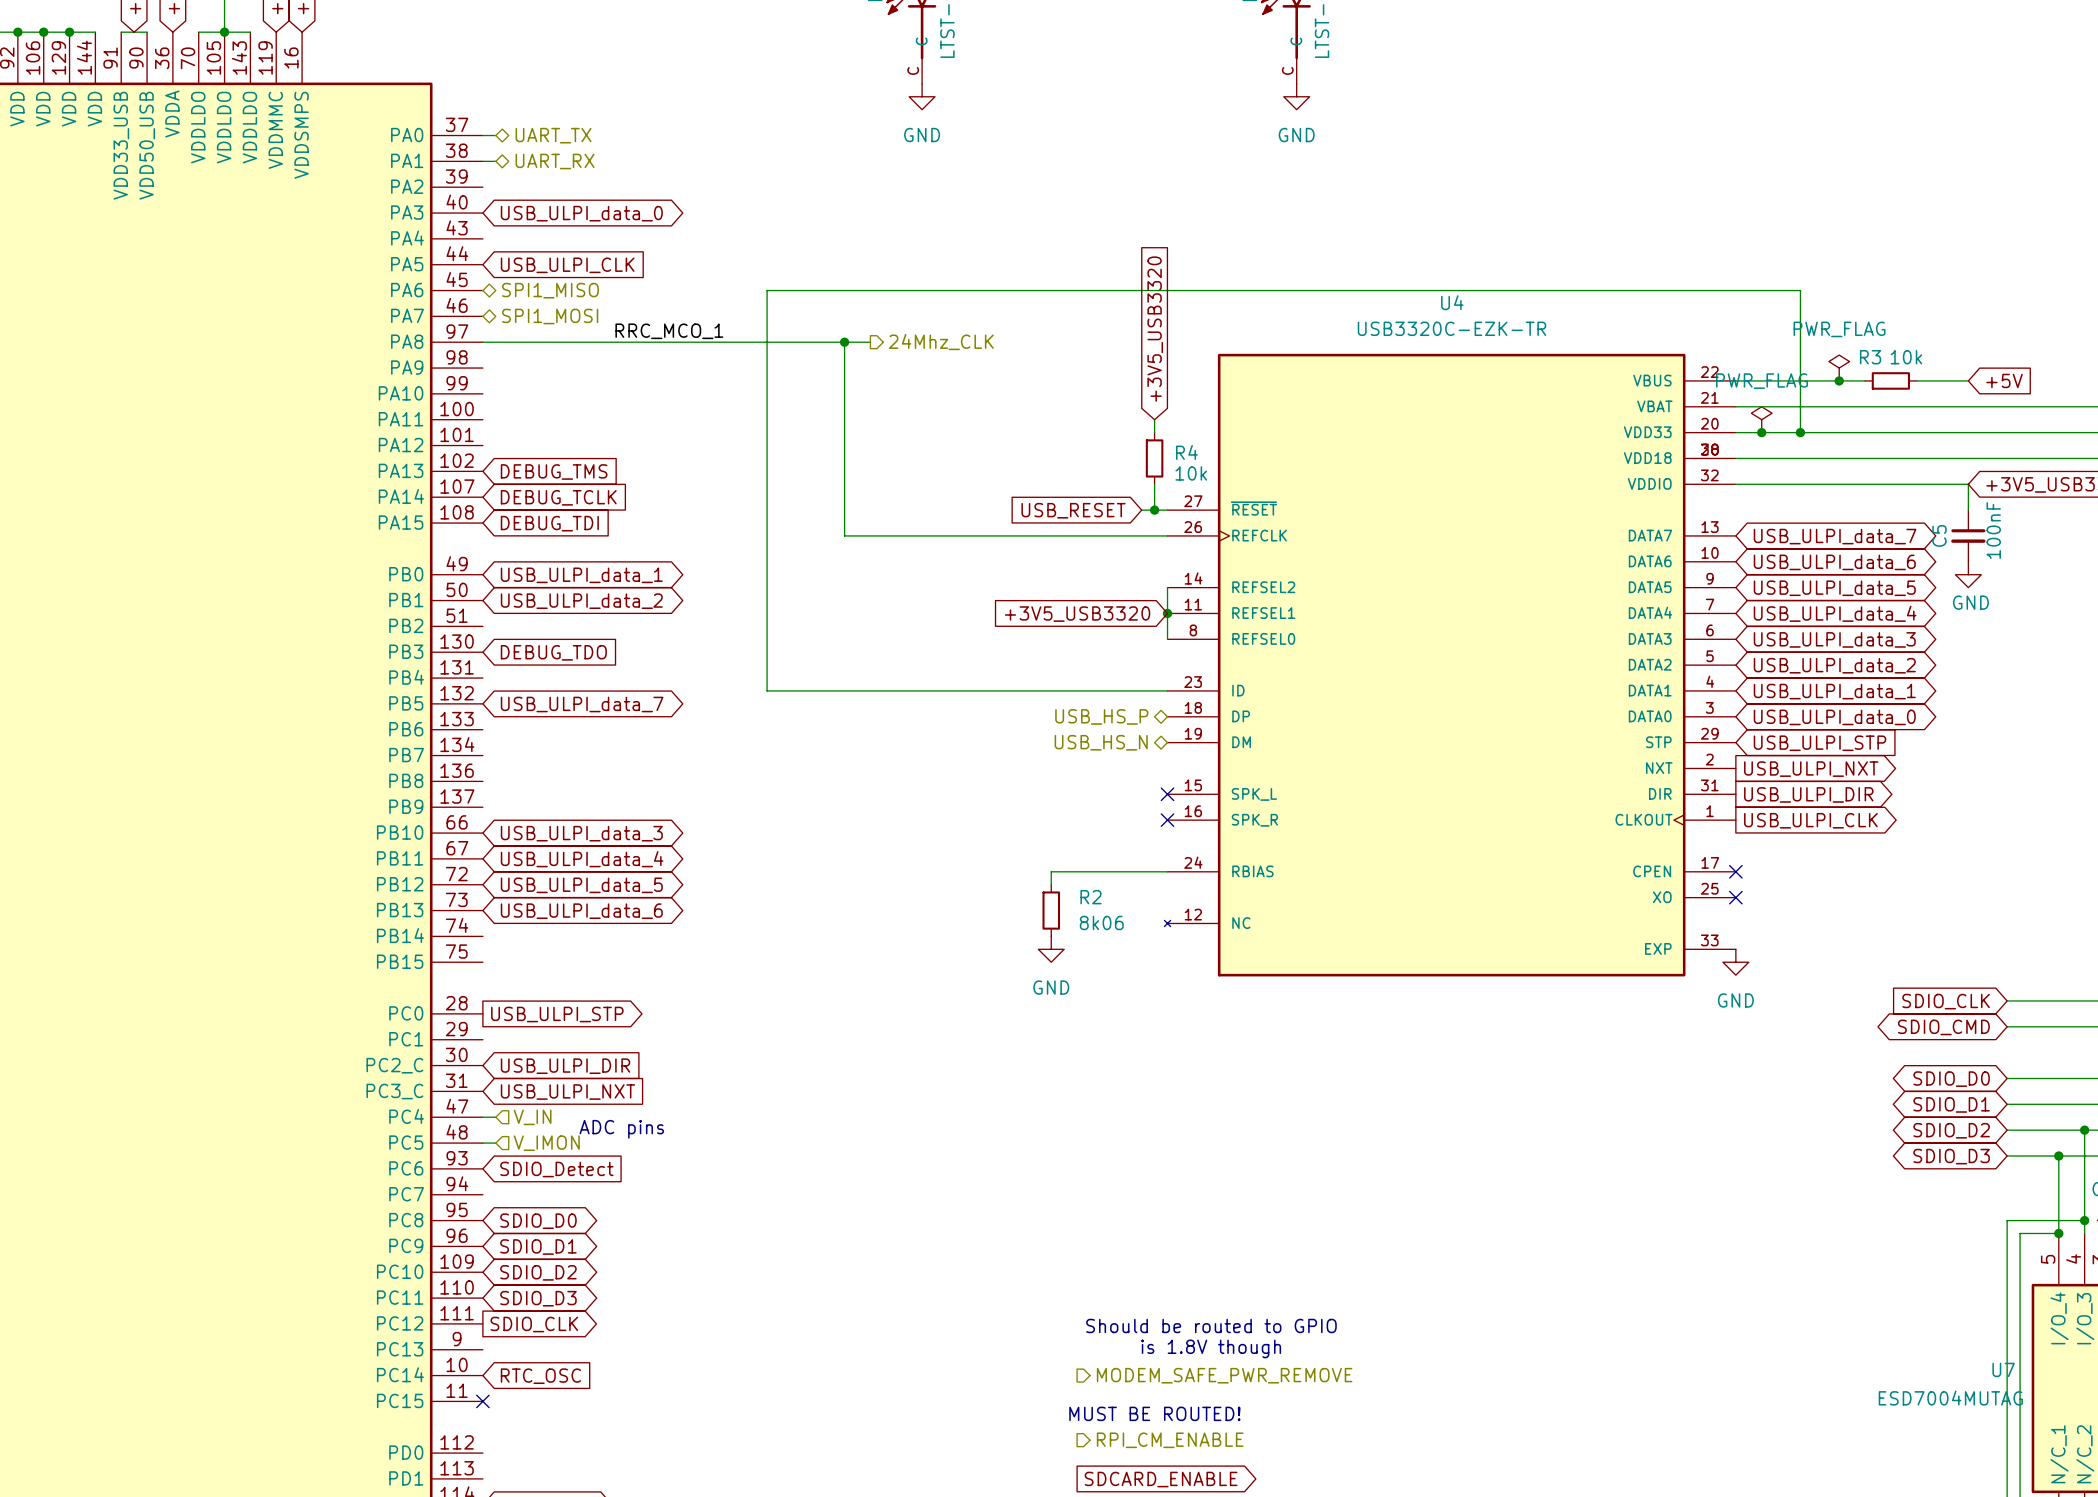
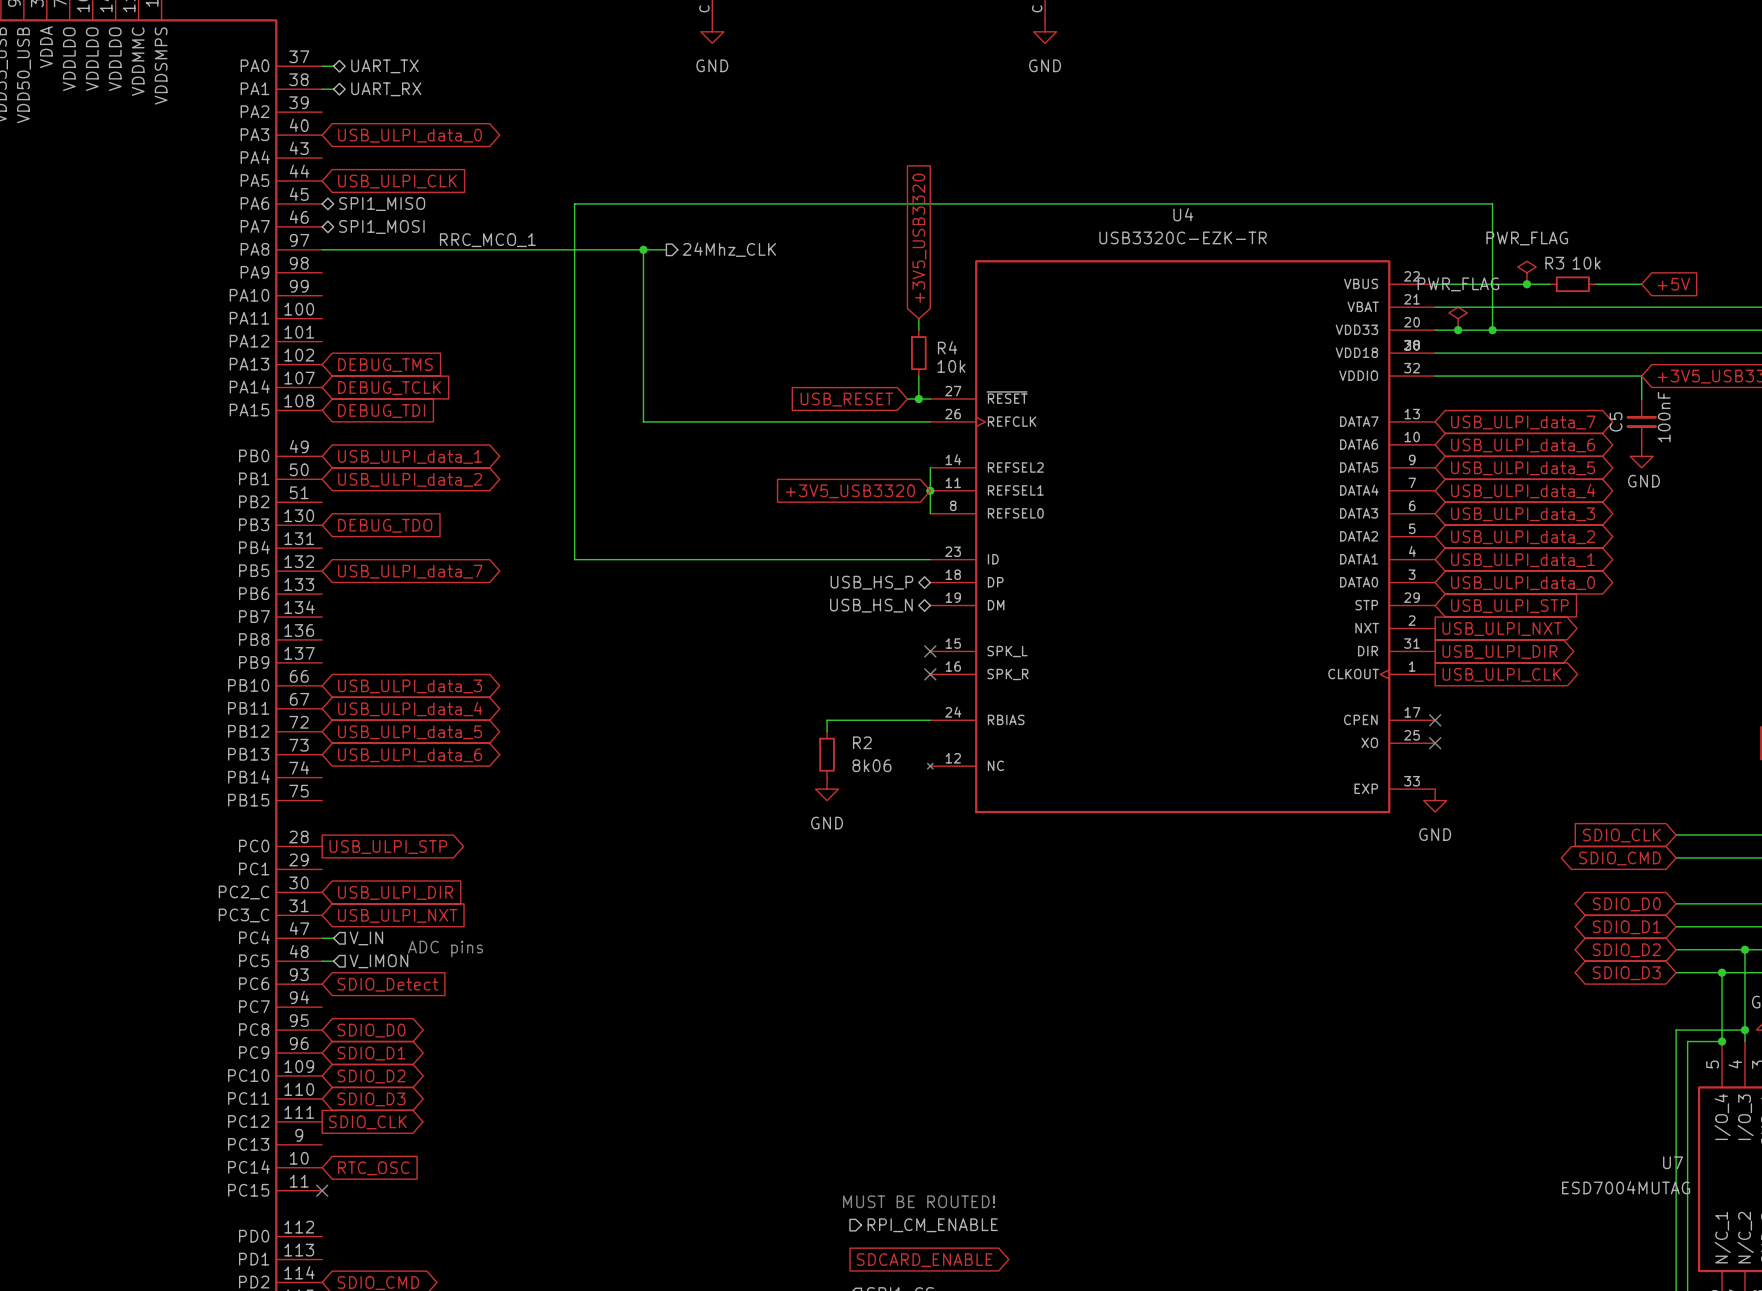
text: Should be routed to GPIO (1211, 1325) -> none
text: is 1.8V though (1211, 1348) -> none
hierarchical label: MODEM_SAFE_PWR_REMOVE (1224, 1375) -> none

